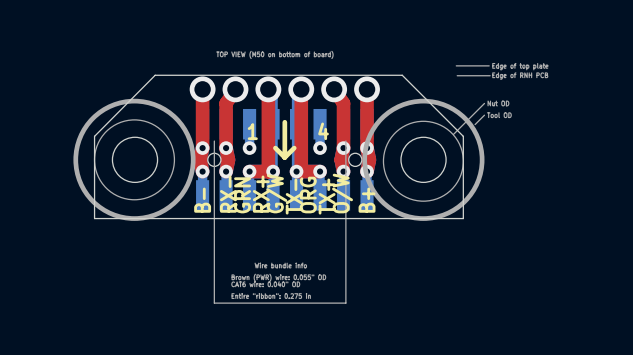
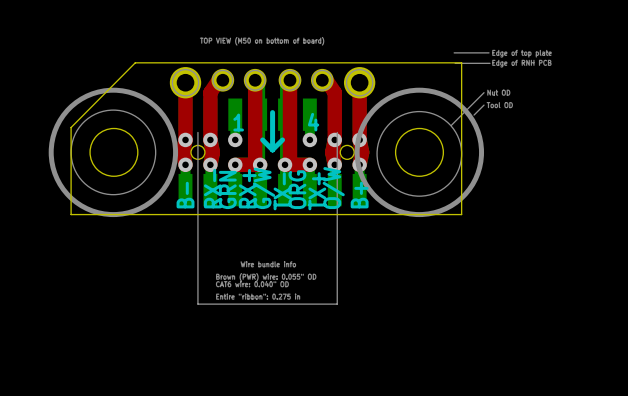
board edge: (402, 75) (463, 136) -> (396, 62) (461, 62) (461, 127)
via: (202, 89) -> none
via: (235, 89) -> none
via: (268, 89) -> none
via: (301, 89) -> none
via: (334, 89) -> none
via: (367, 89) -> none
part: none -> (222, 80)
part: none -> (255, 80)
part: none -> (289, 80)
part: none -> (322, 80)
part: none -> (185, 82)
part: none -> (359, 82)

